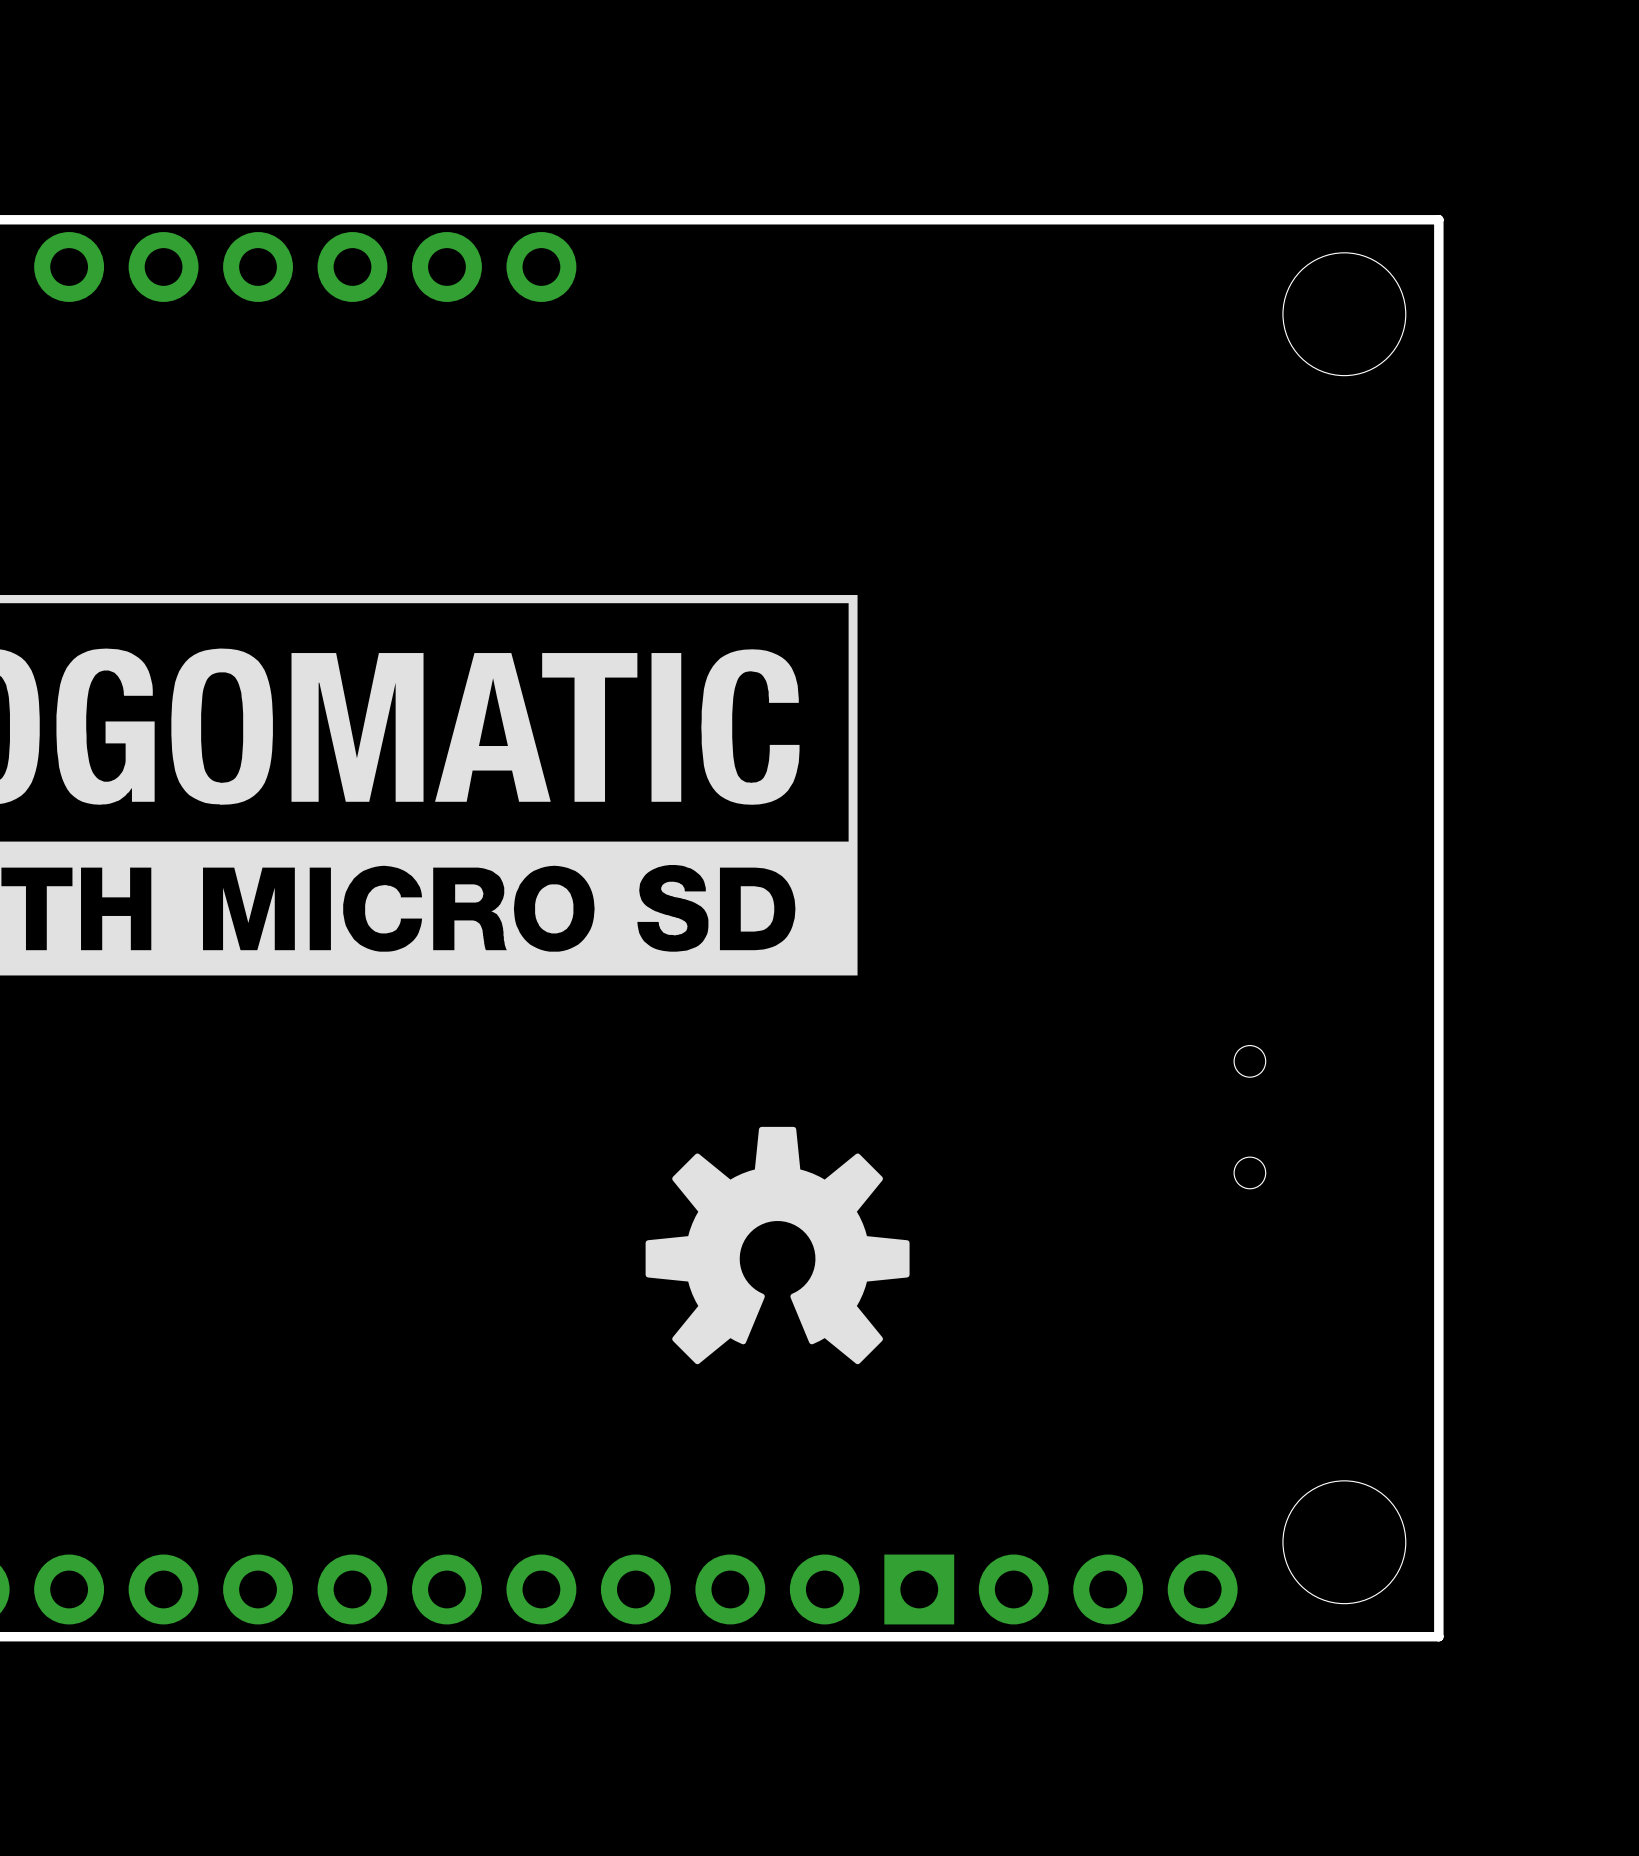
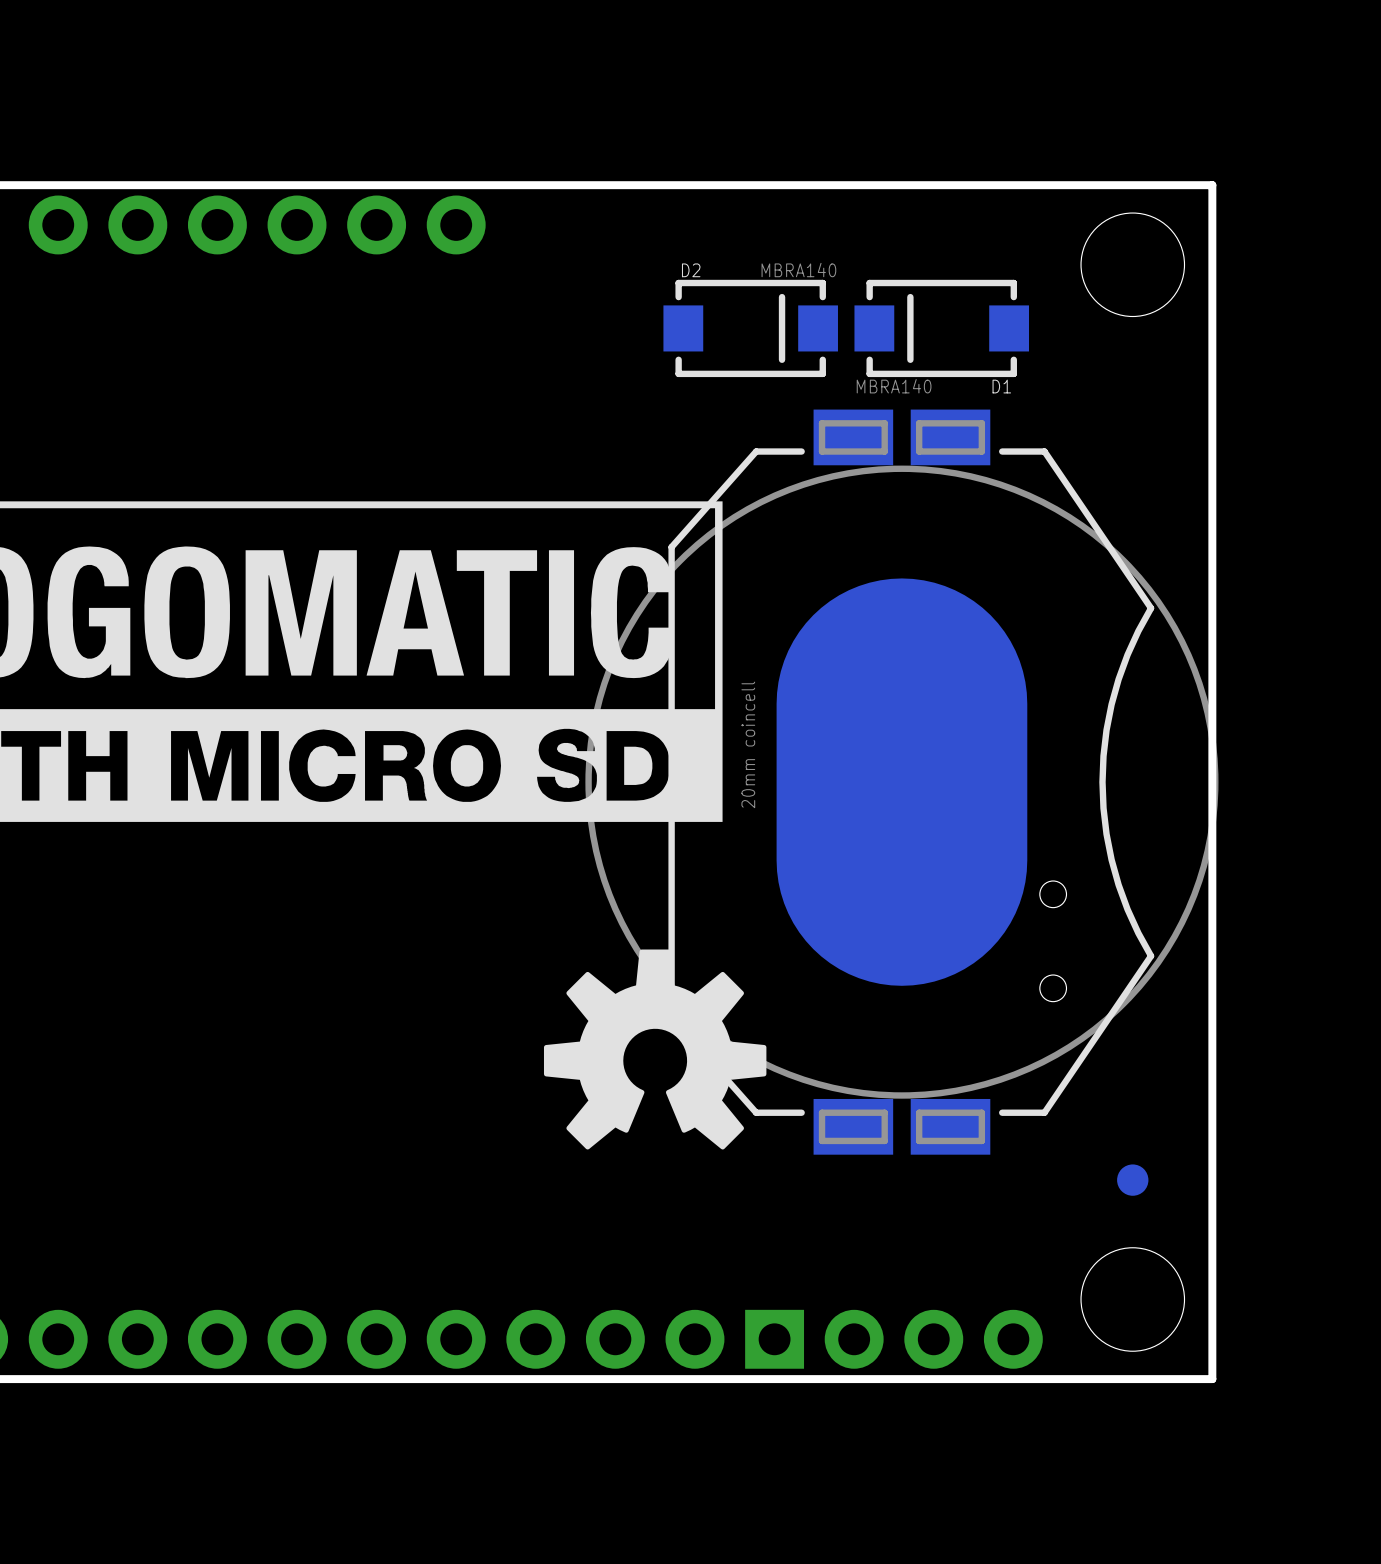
D2: none -> MBRA140 (750, 328)
D1: none -> MBRA140 (941, 328)
part: none -> 20mm coincell (901, 782)
part: none -> (1132, 1180)

